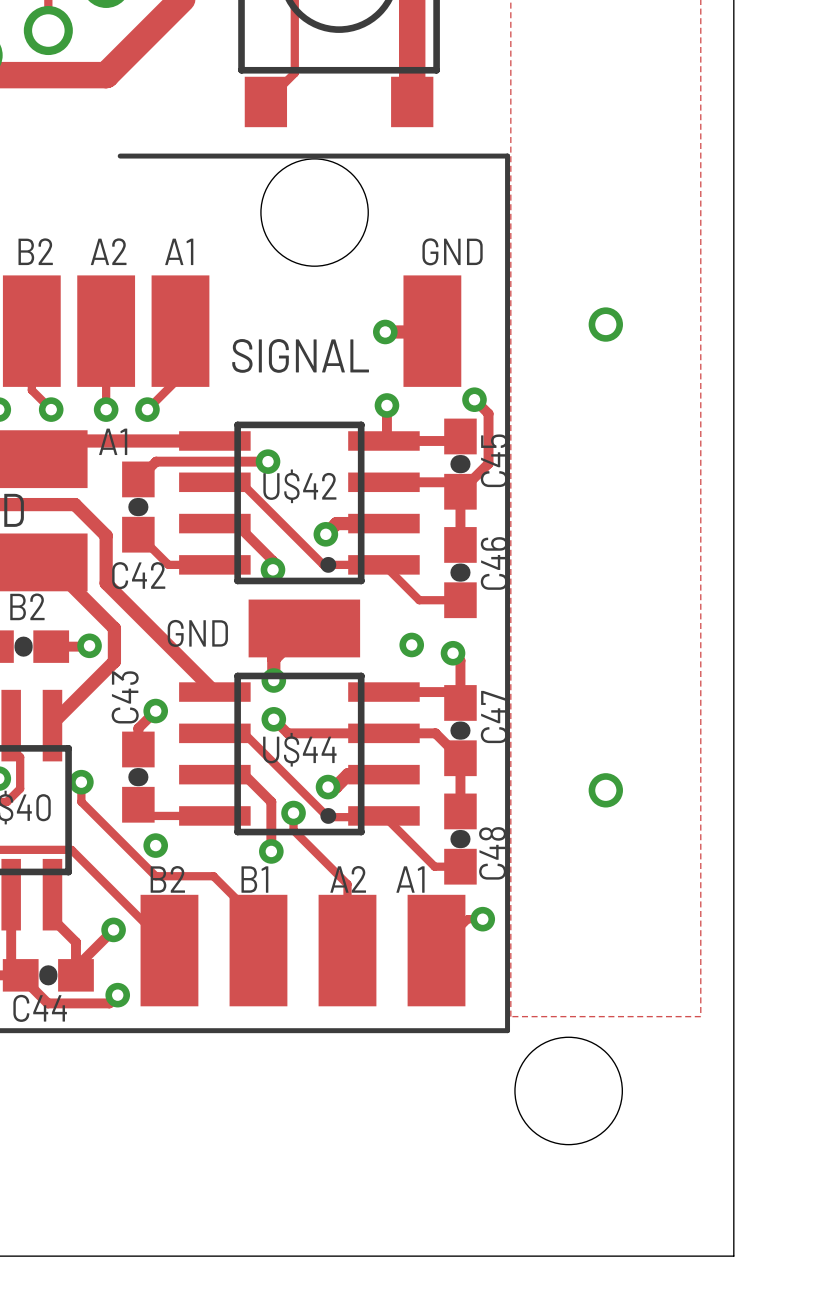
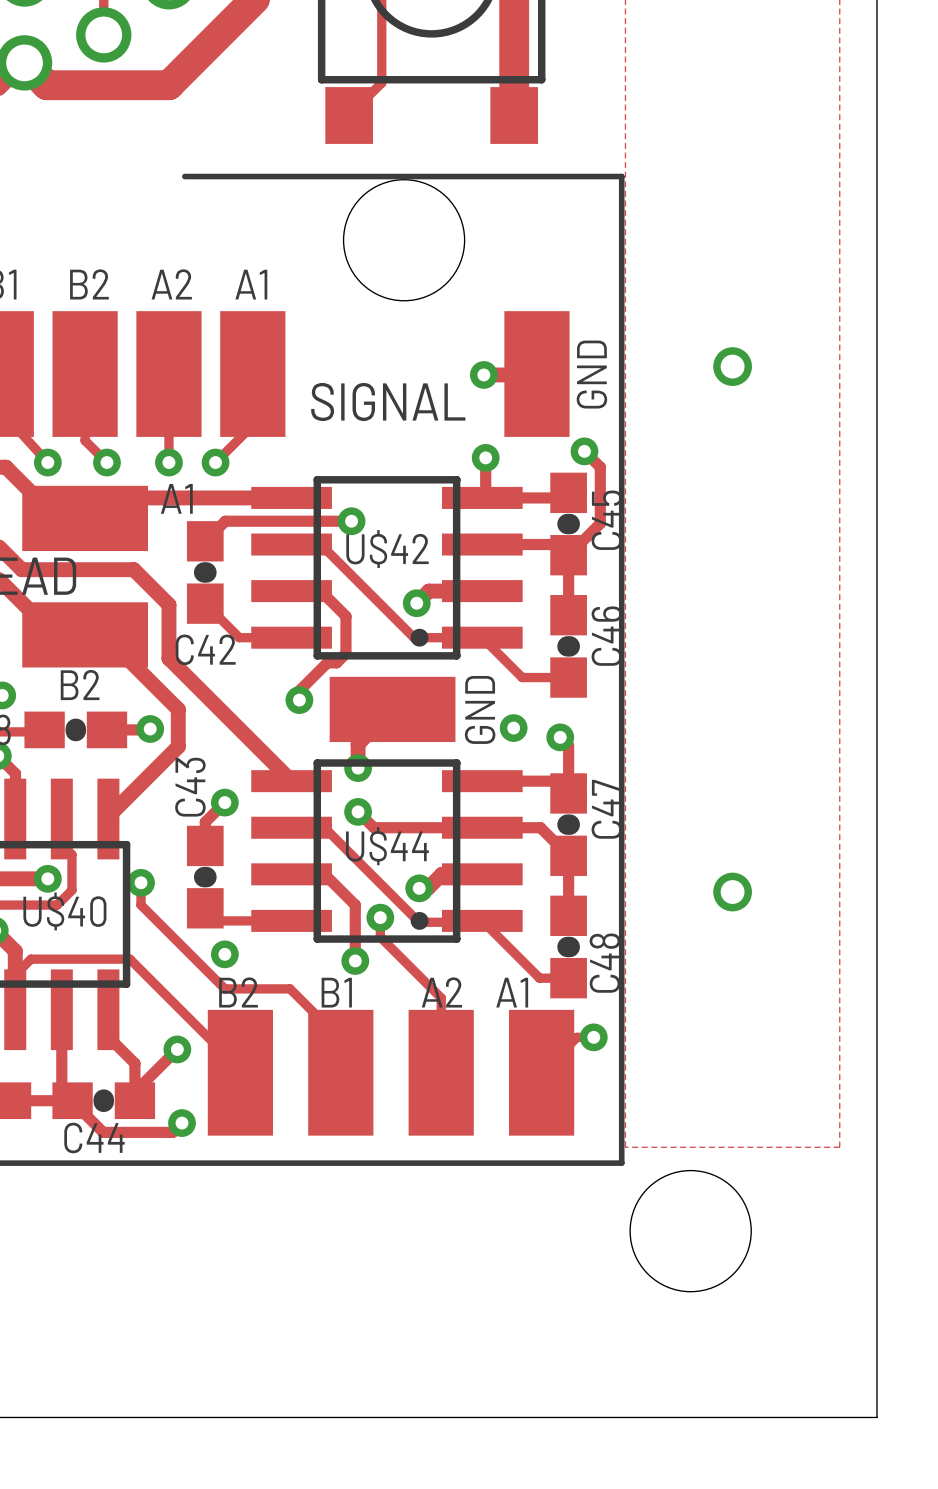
text rotation: 0° (452, 251) -> 90° counterclockwise (591, 374)
track: (235, 523) (272, 560) (272, 569) -> (315, 591) (320, 591) (345, 616) (345, 653) (336, 662) (327, 662) (299, 690) (299, 700)
via position: (272, 569) -> (299, 700)
text rotation: 0° (197, 633) -> 90° counterclockwise (480, 709)
text position: GND (197, 633) -> GND (480, 709)

